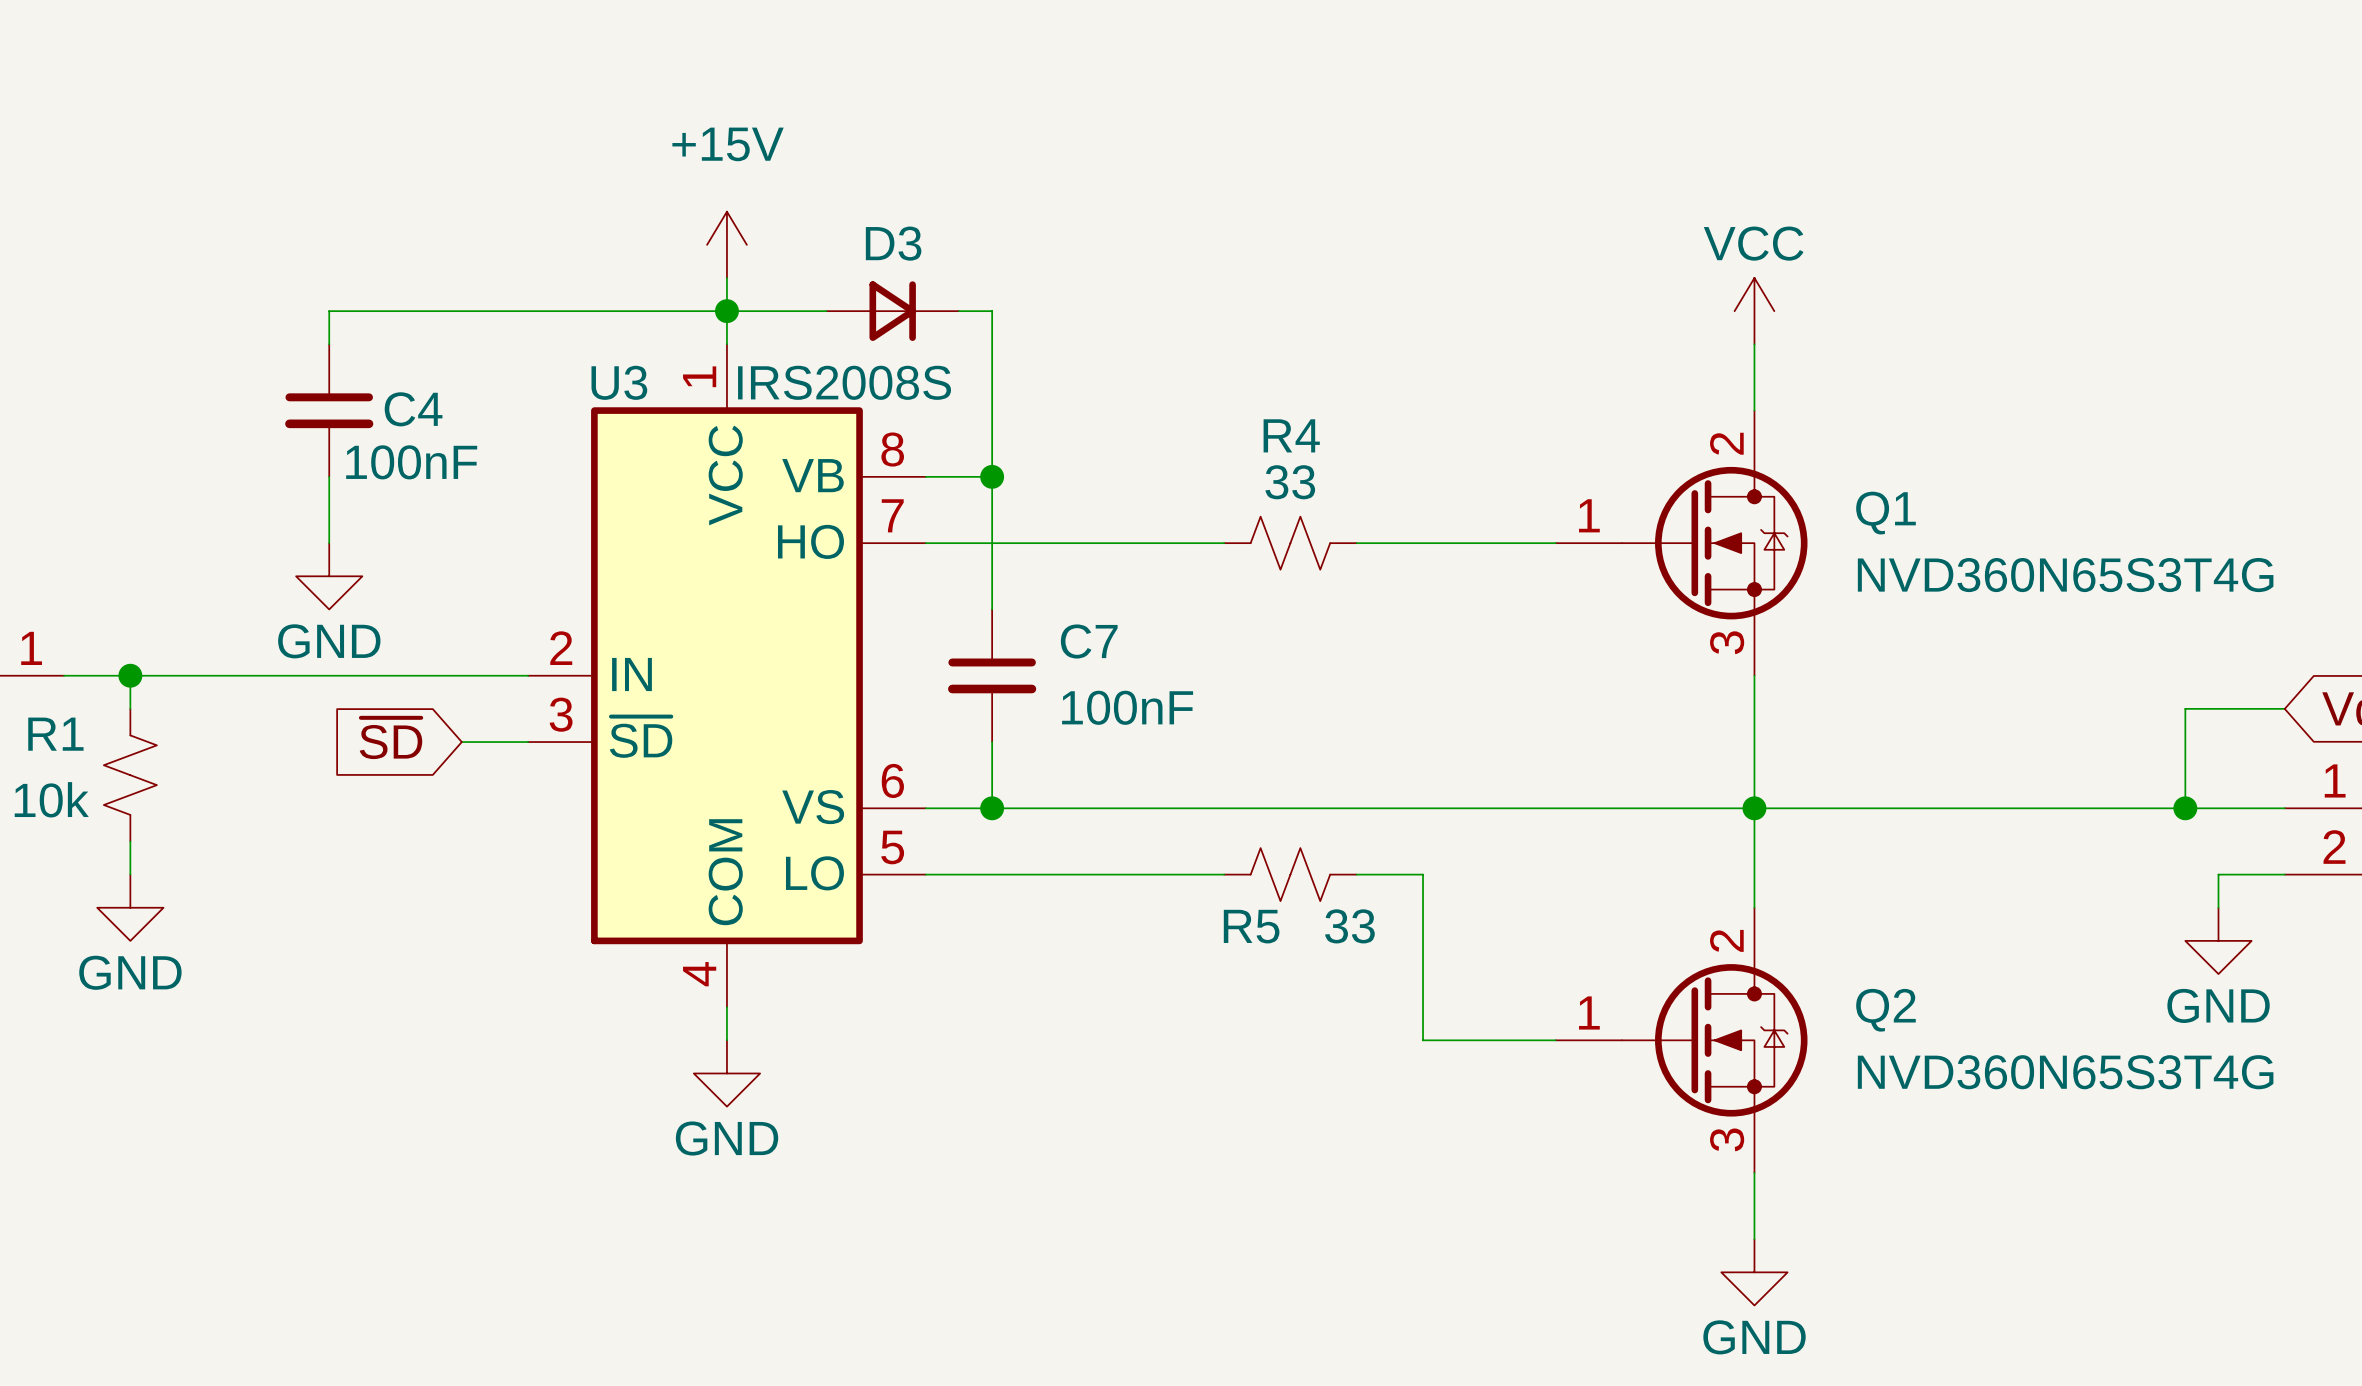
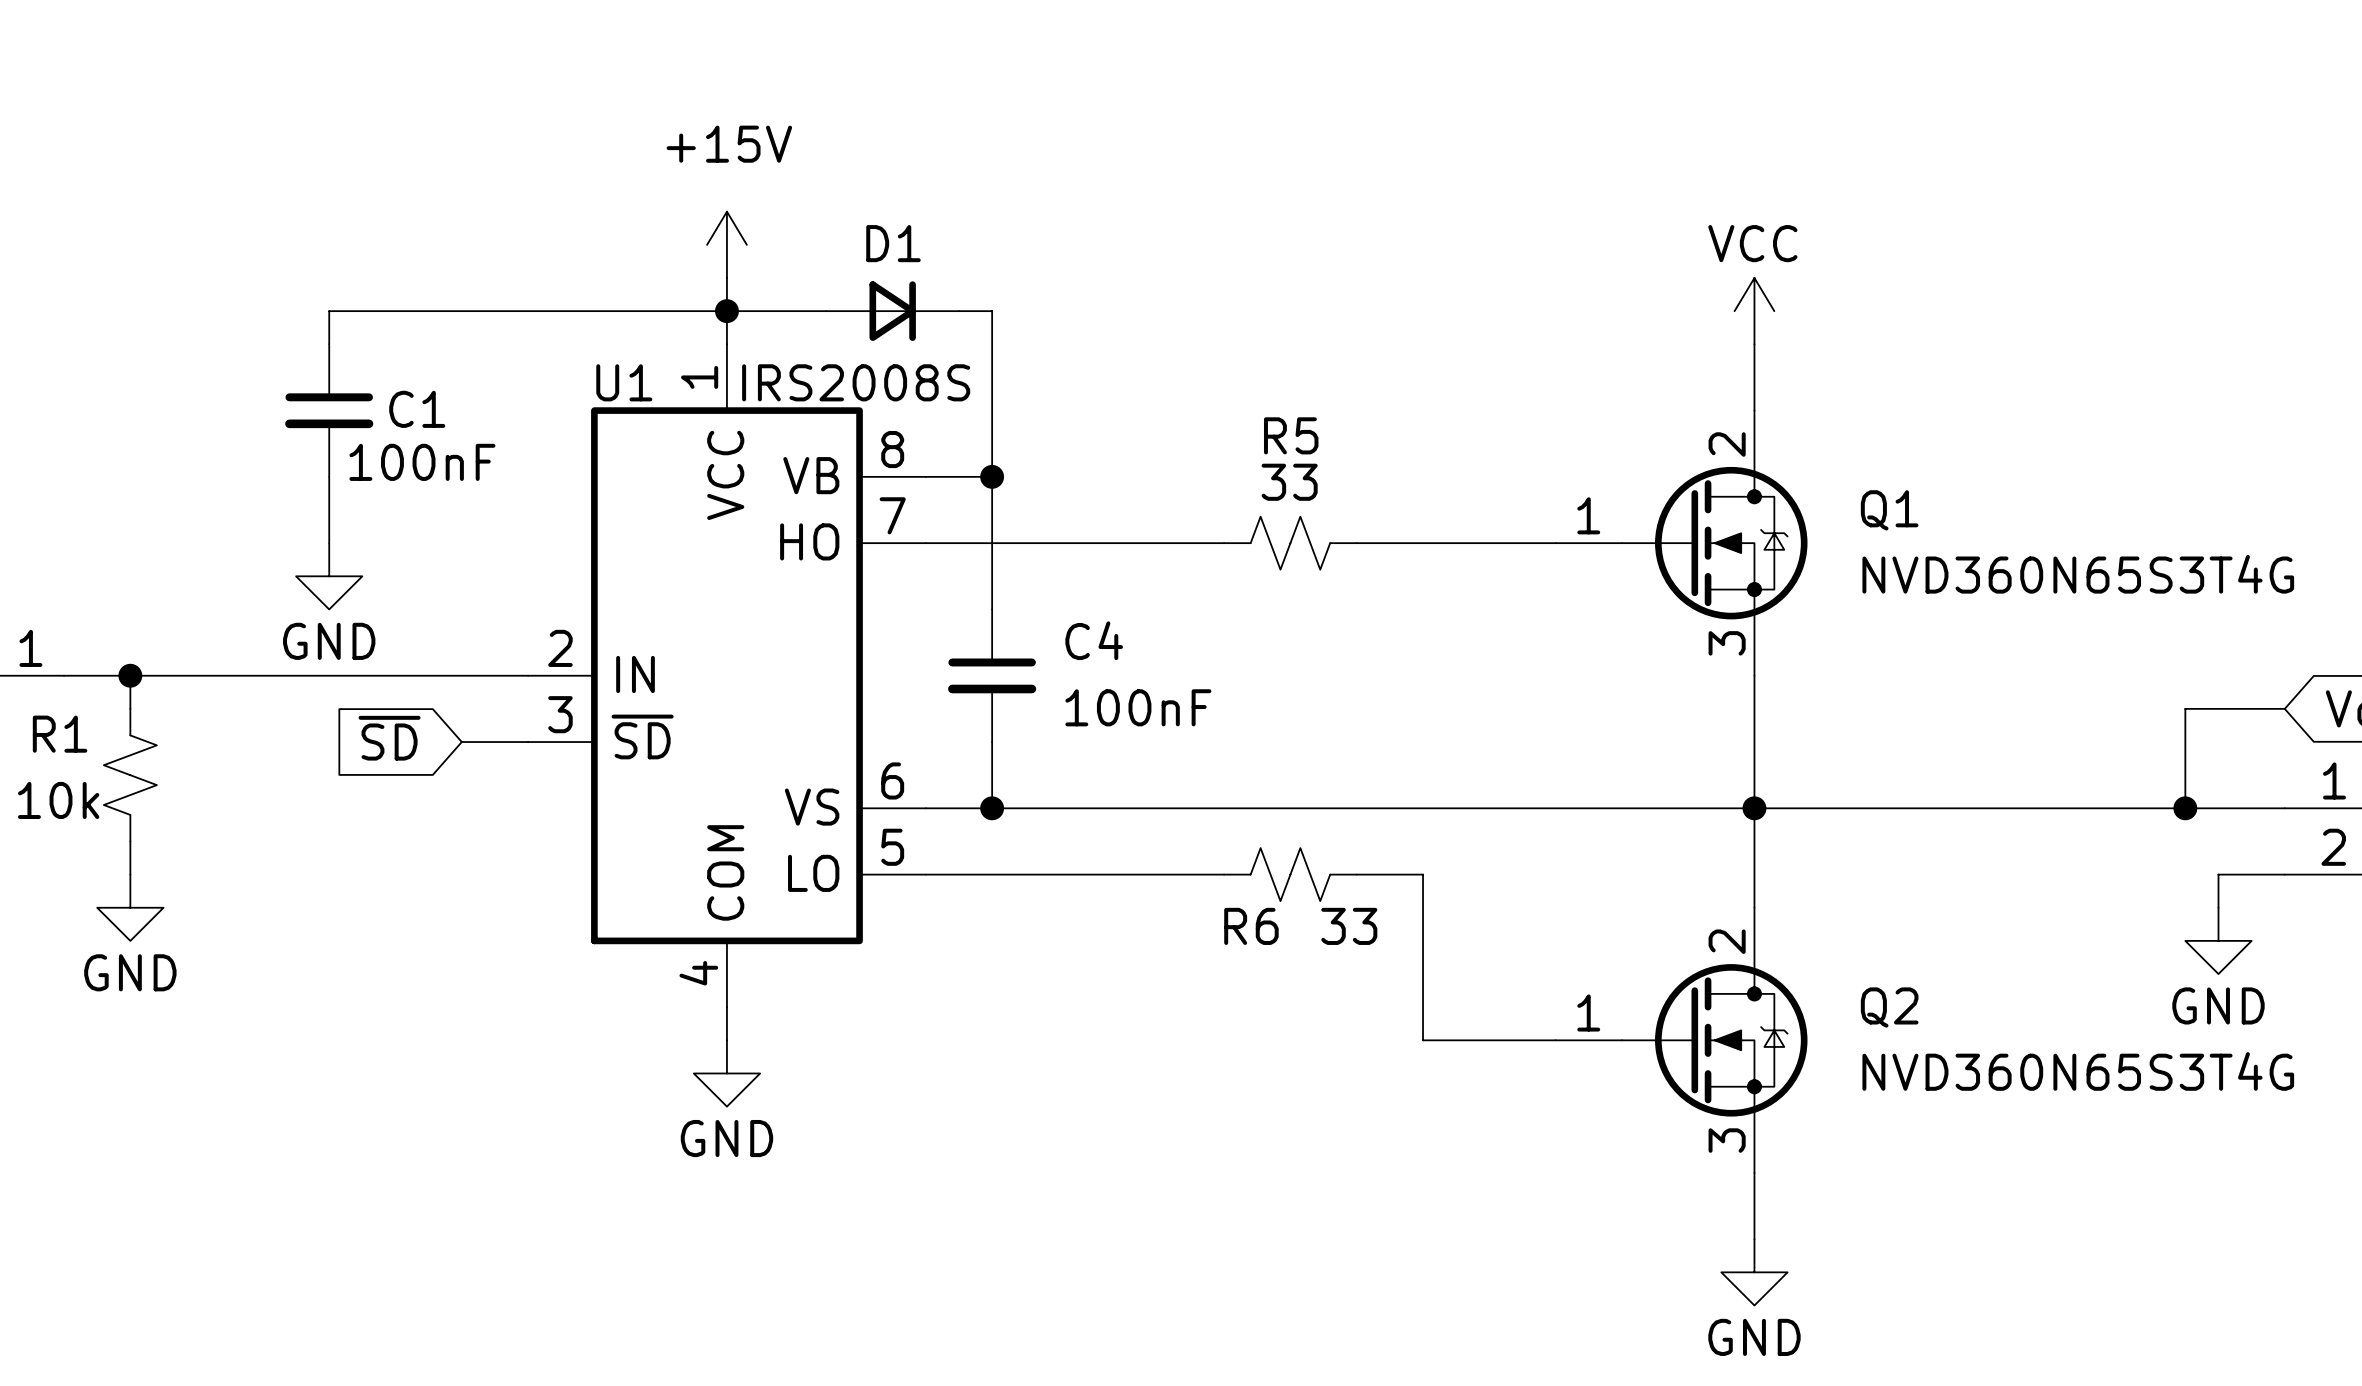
D3 name: D3 (893, 243) -> D1 (893, 243)
U3 name: U3 (619, 382) -> U1 (624, 382)
C4 name: C4 (413, 409) -> C1 (417, 409)
R4 name: R4 (1291, 435) -> R5 (1291, 435)
C7 name: C7 (1089, 641) -> C4 (1094, 640)
R5 name: R5 (1251, 926) -> R6 (1251, 926)

